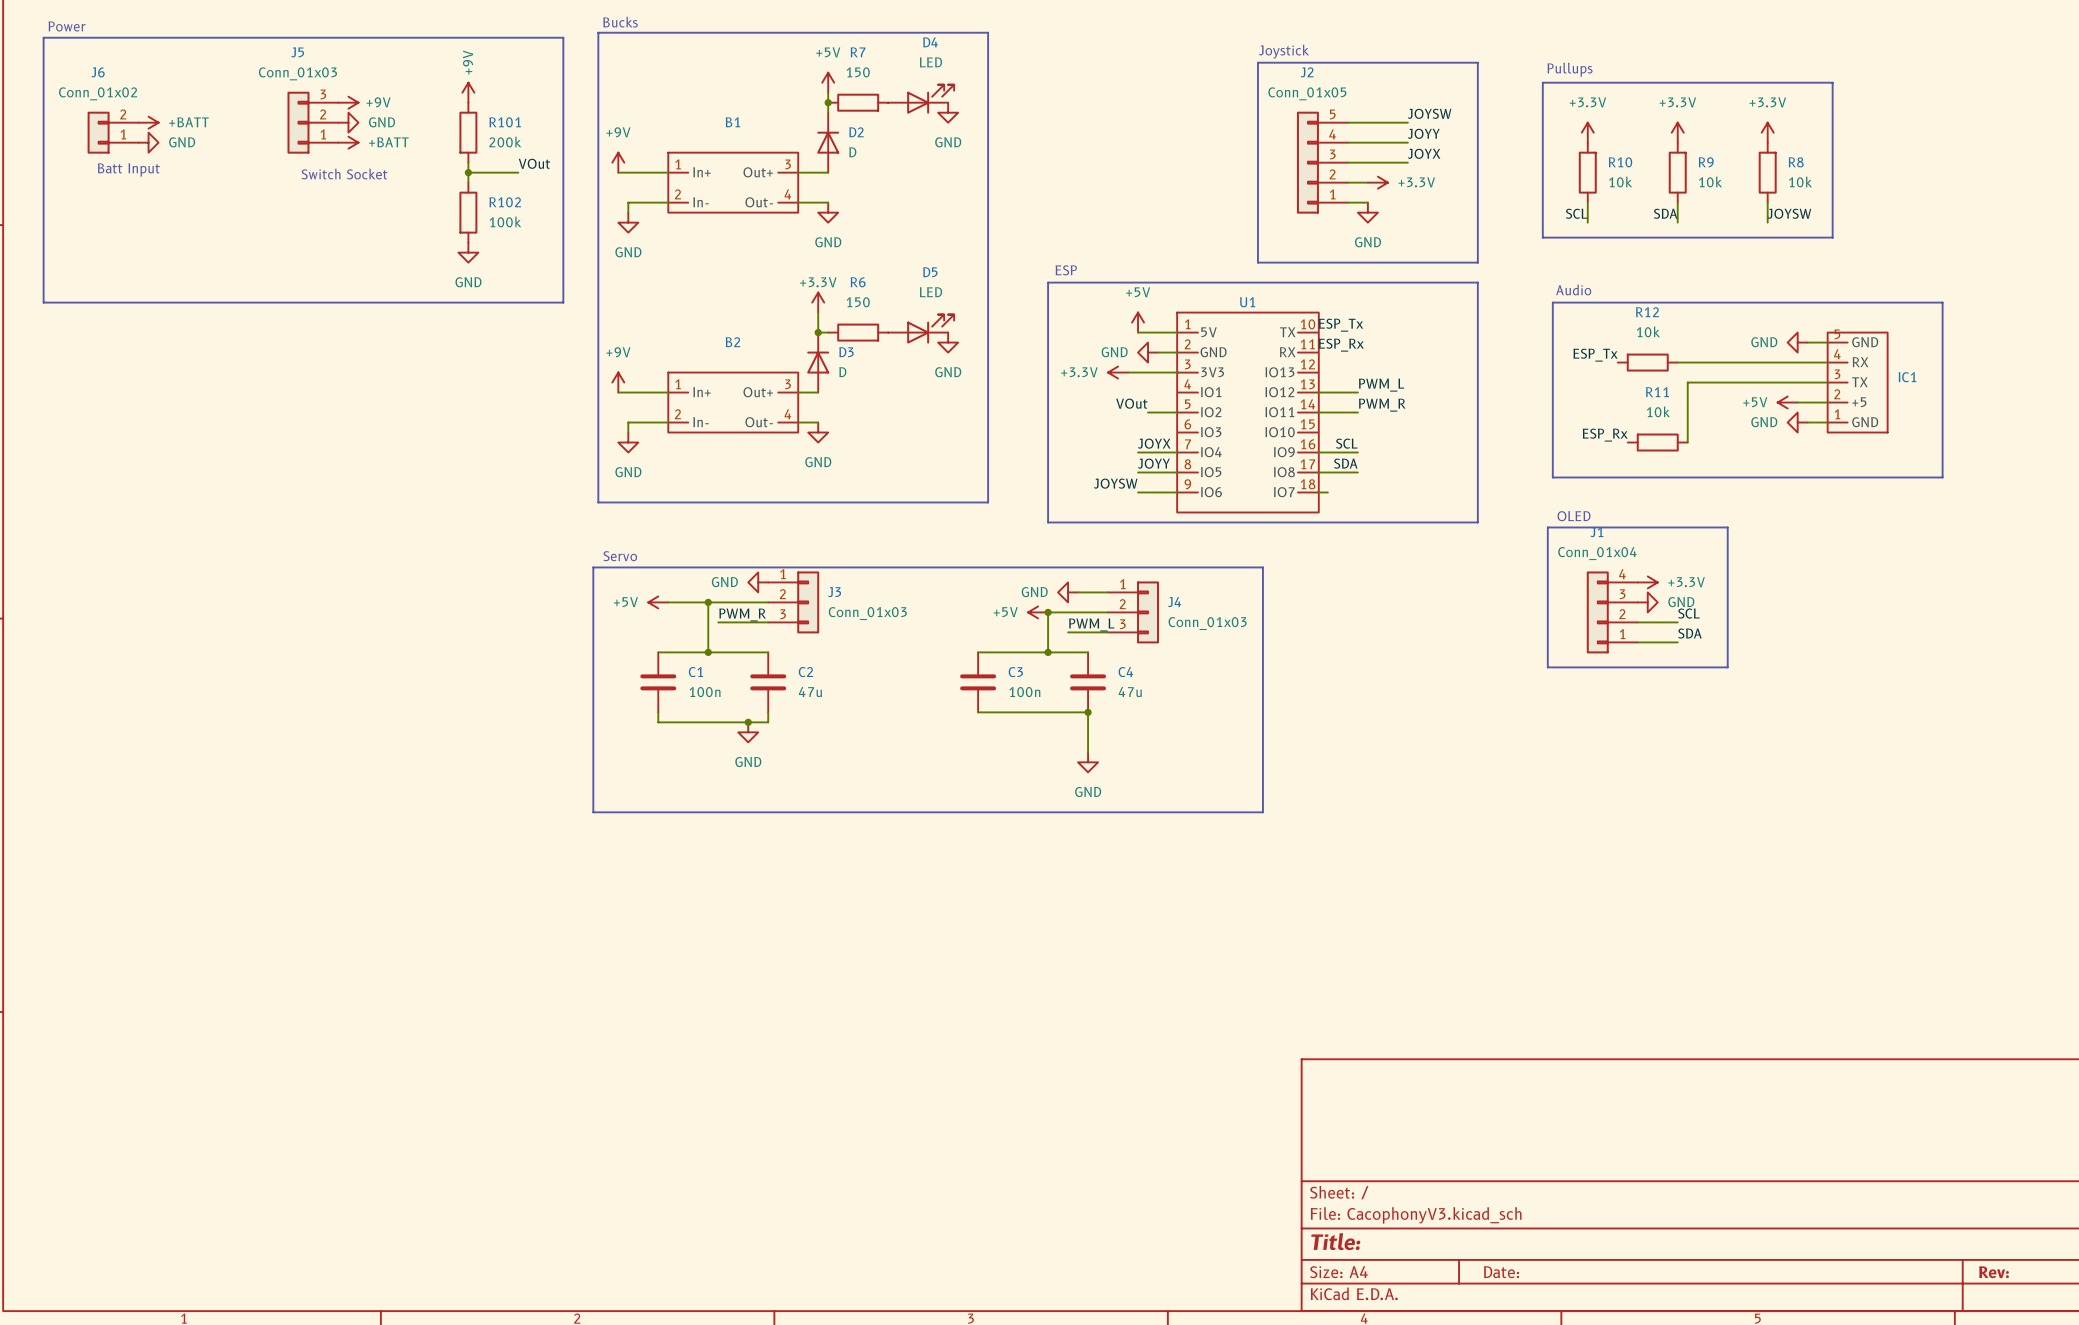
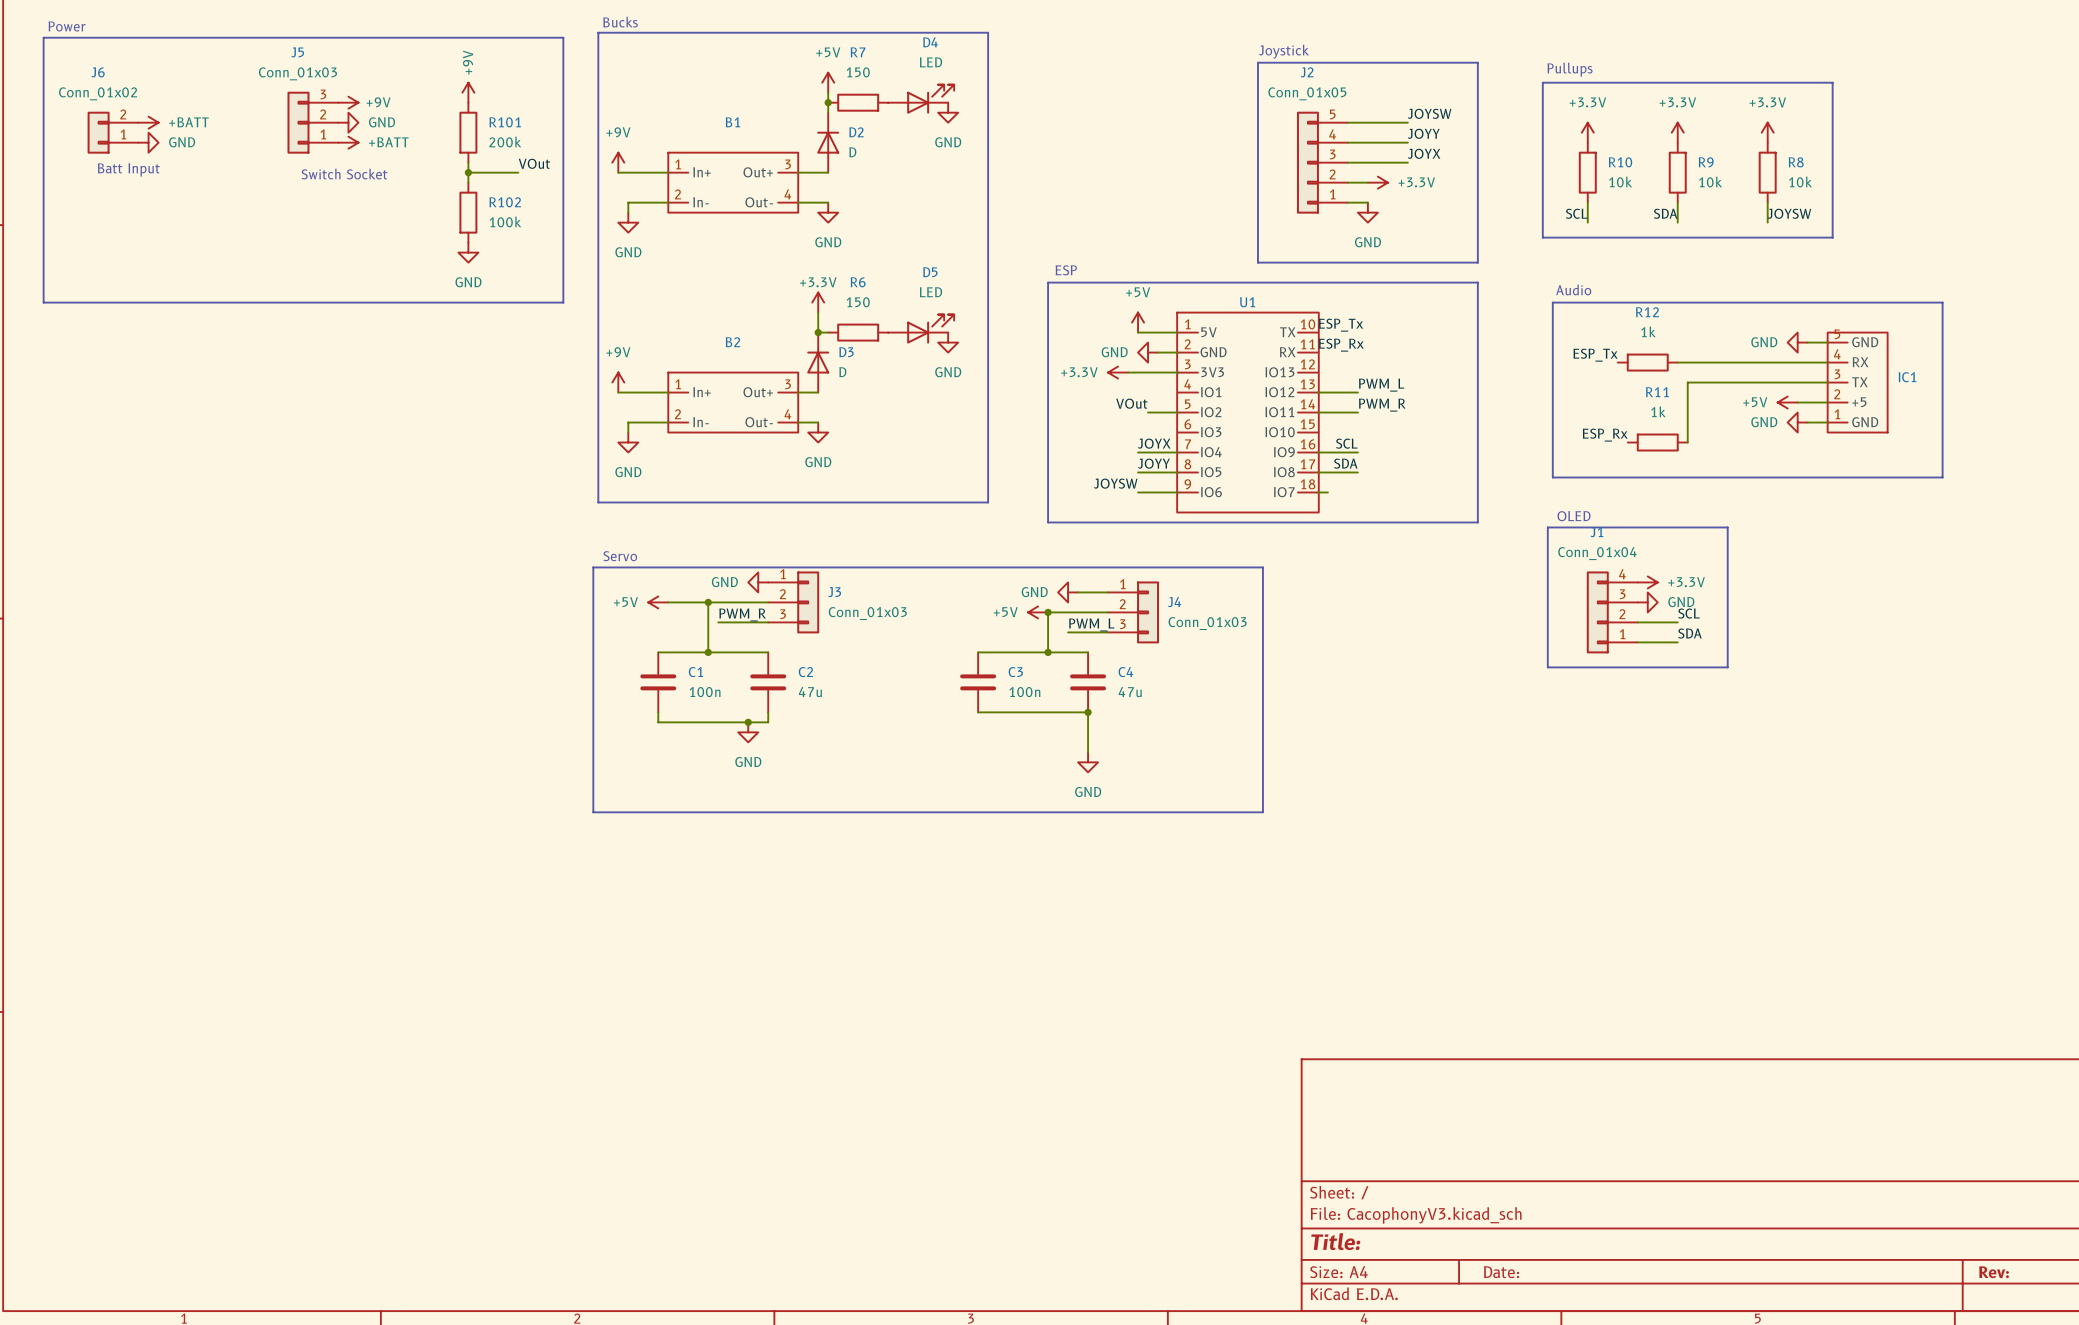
R12 value: 10k (1648, 331) -> 1k (1648, 331)
R11 value: 10k (1658, 411) -> 1k (1658, 411)

